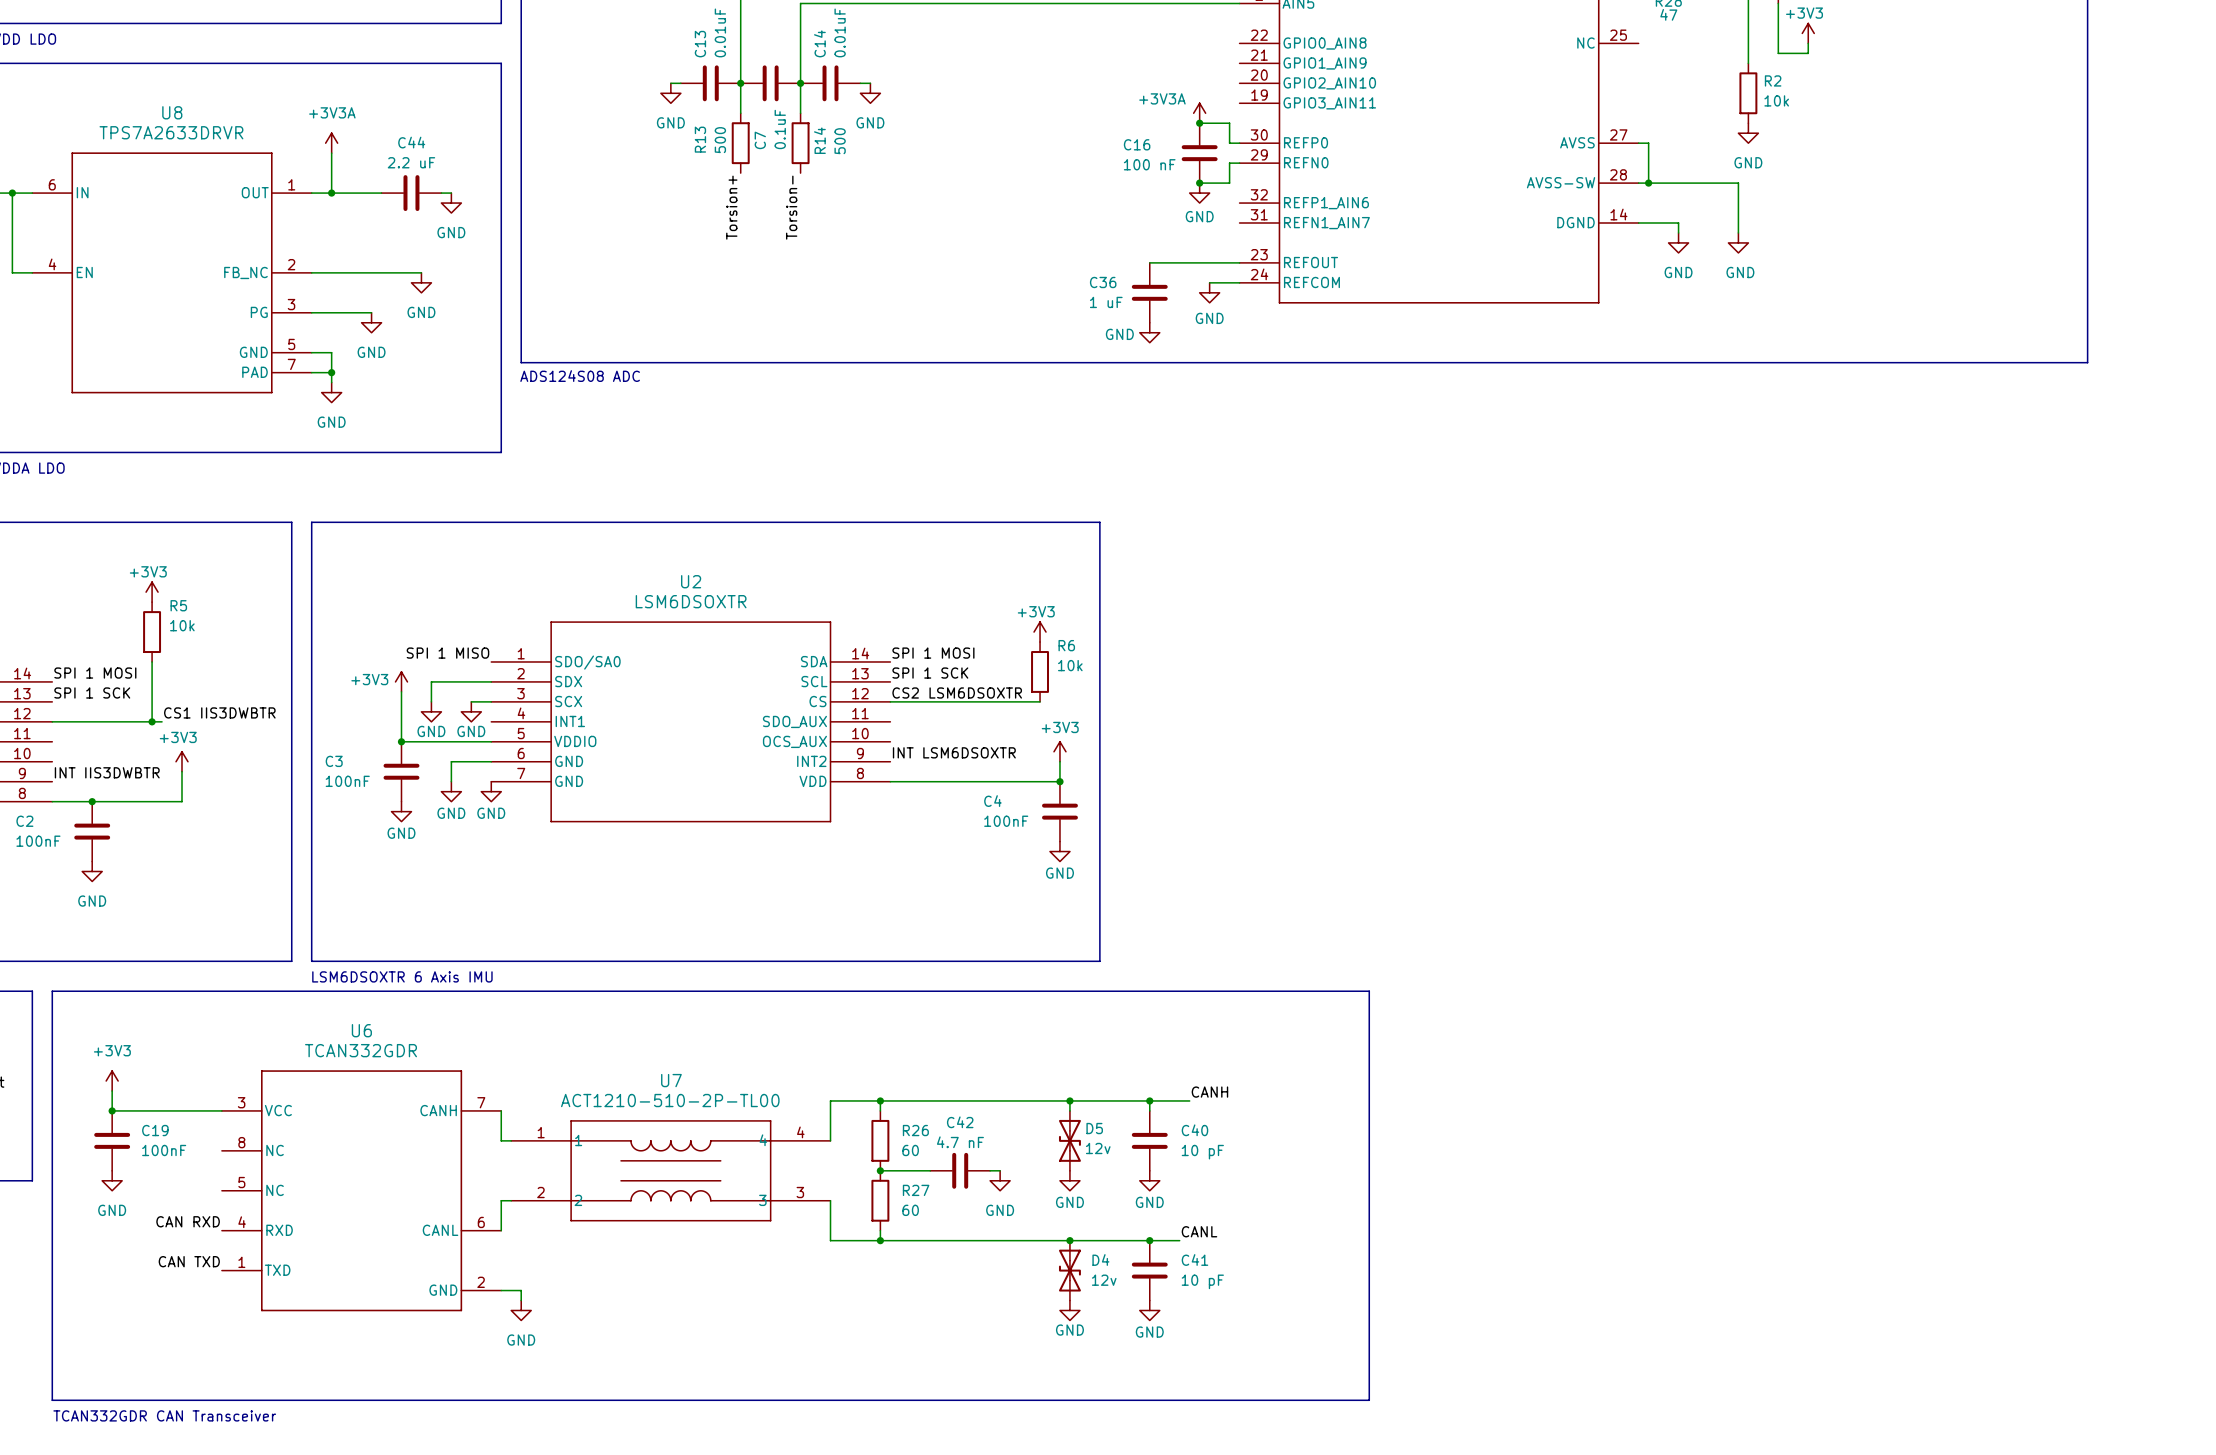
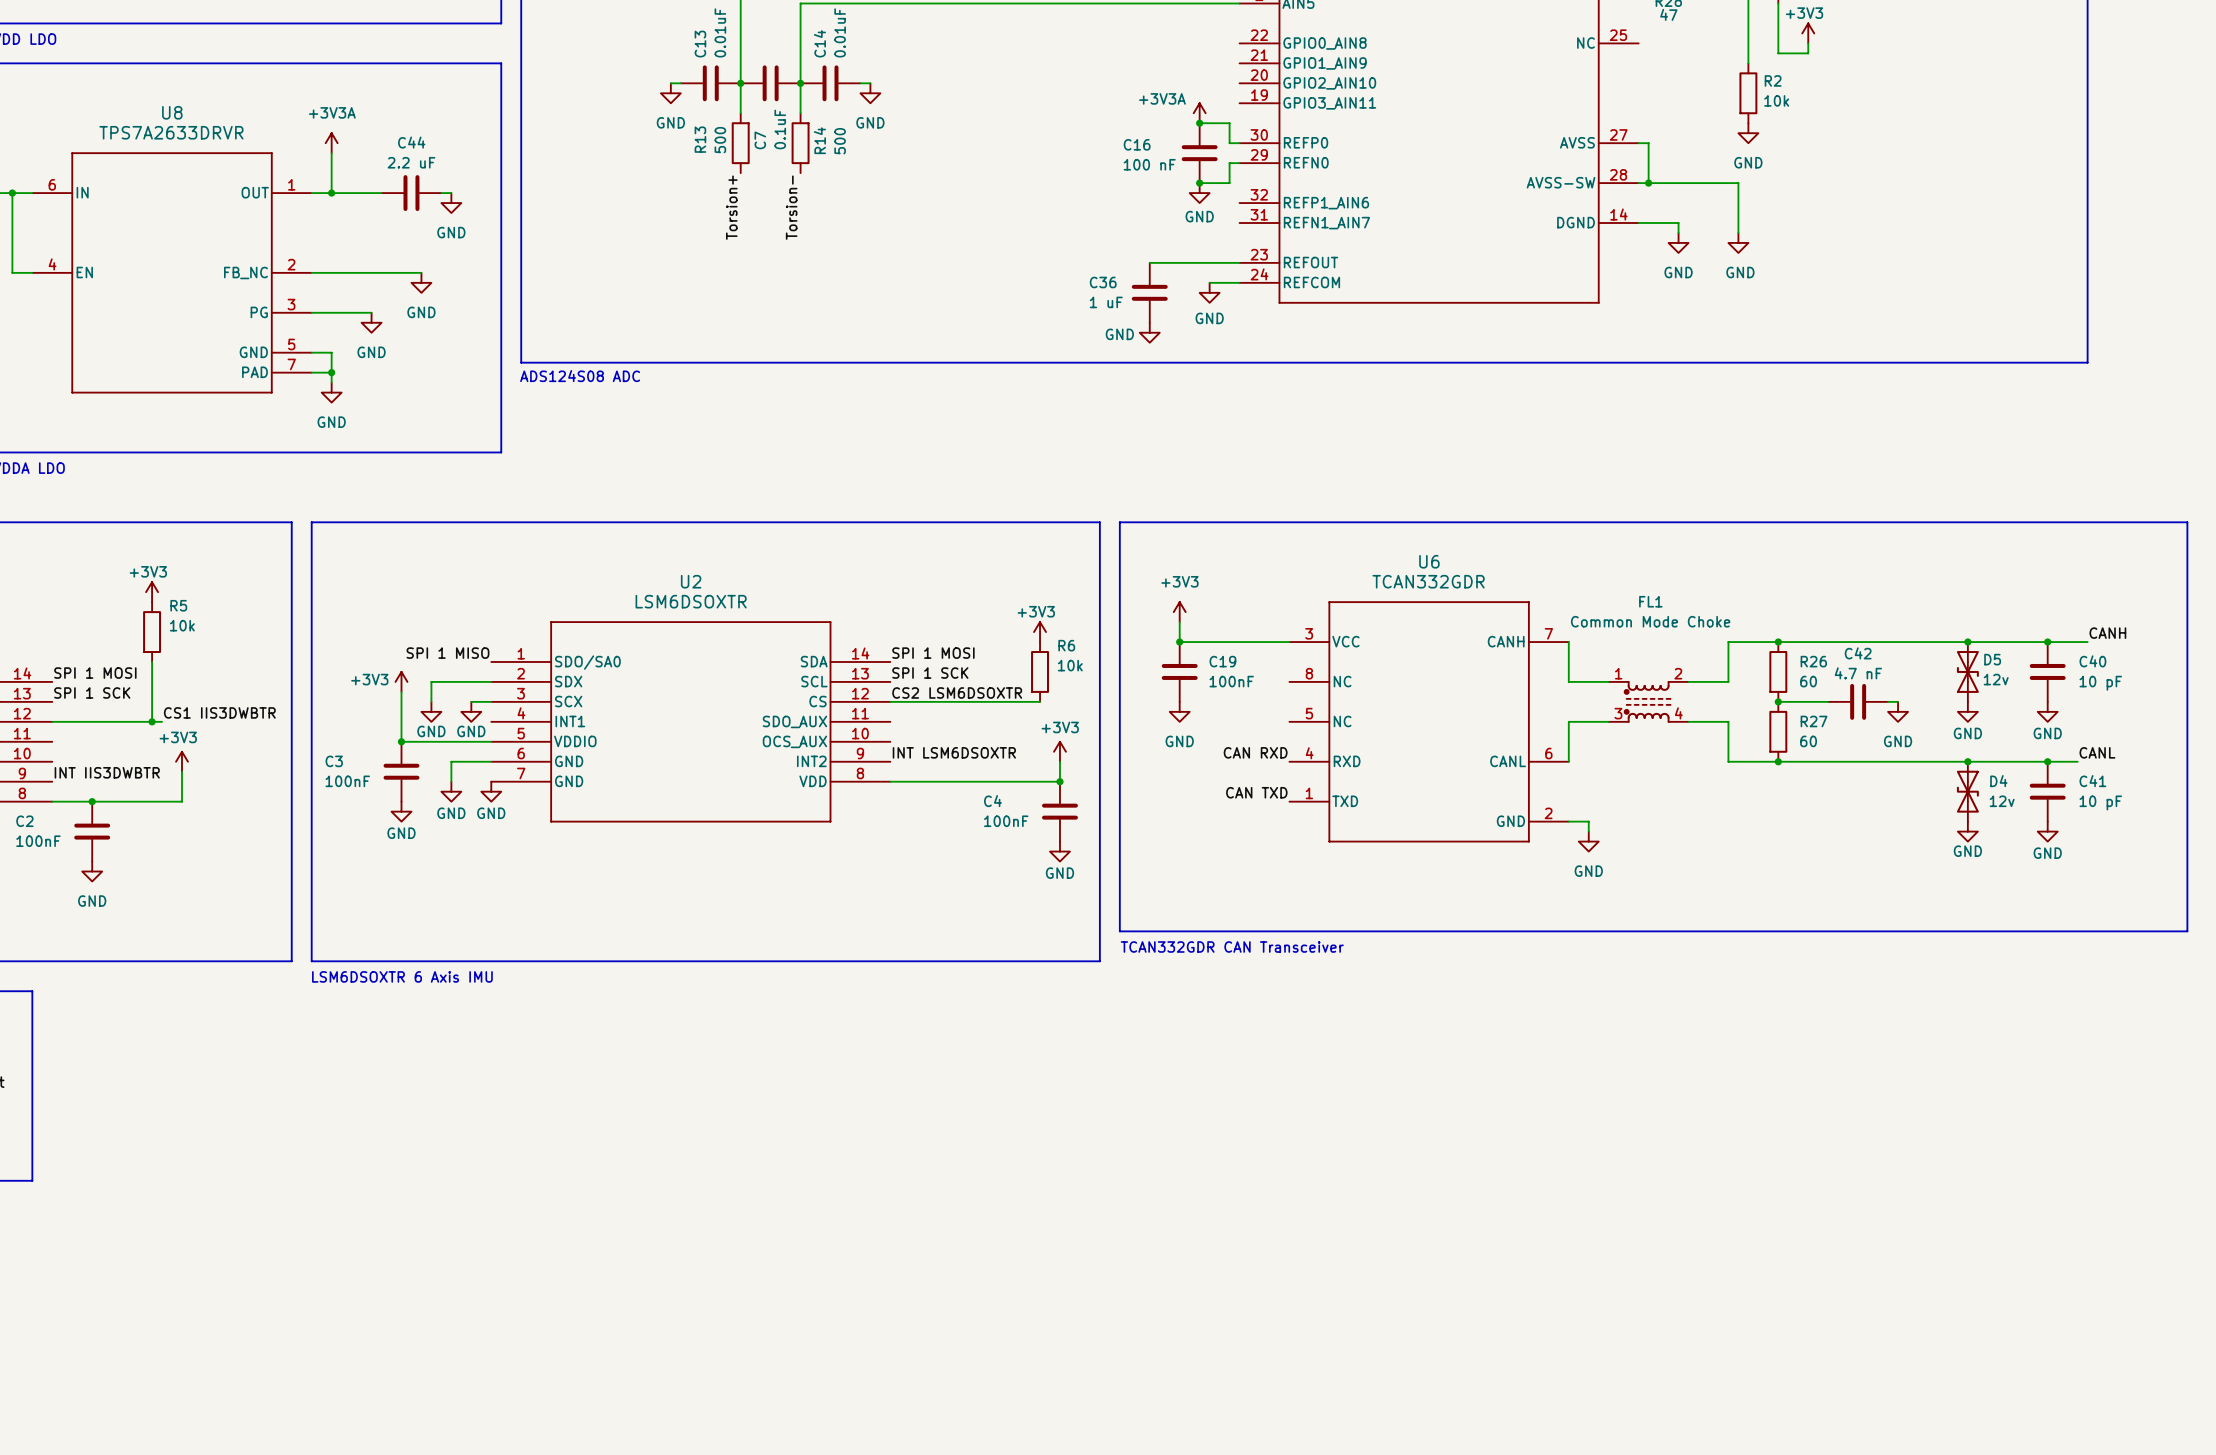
line: none -> (1119, 522) (2187, 522) (2187, 931) (1119, 931) (1119, 522)
power symbol: none -> +3V3 (1179, 612)
wire: none -> (1179, 622) (1179, 642) (1289, 642)
label: none -> CANH (2107, 633)
junction: none -> (1179, 642)
wire: none -> (1568, 642) (1568, 681) (1608, 681)
junction: none -> (1778, 642)
junction: none -> (1967, 642)
junction: none -> (2047, 642)
wire: none -> (2087, 642) (1728, 642) (1728, 681) (1688, 681)
FL1: none -> Common Mode Choke (1648, 701)
wire: none -> (1778, 701) (1828, 701)
junction: none -> (1778, 701)
wire: none -> (1888, 701) (1898, 701)
power symbol: none -> GND (1179, 711)
power symbol: none -> GND (1898, 711)
power symbol: none -> GND (1967, 711)
power symbol: none -> GND (2047, 711)
wire: none -> (1608, 721) (1568, 721) (1568, 761)
wire: none -> (1688, 721) (1728, 721) (1728, 761) (2077, 761)
label: none -> CAN RXD (1255, 752)
label: none -> CANL (2097, 752)
junction: none -> (1778, 761)
junction: none -> (1967, 761)
junction: none -> (2047, 761)
label: none -> CAN TXD (1256, 792)
wire: none -> (1568, 821) (1588, 821) (1588, 831)
power symbol: none -> GND (1967, 831)
power symbol: none -> GND (2047, 831)
power symbol: none -> GND (1588, 841)
text: none -> TCAN332GDR CAN Transceiver (1232, 946)
line: (52, 991) (1369, 991) (1369, 1400) (52, 1400) (52, 991) -> none
power symbol: +3V3 (112, 1081) -> none
wire: (112, 1091) (112, 1110) (221, 1110) -> none
label: CANH (1209, 1092) -> none
wire: (880, 1100) (880, 1110) -> none
junction: (880, 1100) -> none
wire: (1069, 1100) (1069, 1110) -> none
junction: (1069, 1100) -> none
wire: (1149, 1100) (1149, 1110) -> none
junction: (1149, 1100) -> none
wire: (1189, 1100) (830, 1100) (830, 1140) -> none
junction: (112, 1110) -> none
wire: (501, 1110) (501, 1140) (511, 1140) -> none
C19 position: (112, 1140) -> (1179, 671)
R26 position: (880, 1140) -> (1778, 671)
D5 position: (1069, 1140) -> (1967, 671)
C40 position: (1149, 1140) -> (2047, 671)
U7: ACT1210-510-2P-TL00 (670, 1170) -> none
wire: (880, 1170) (930, 1170) -> none
junction: (880, 1170) -> none
C42 position: (960, 1170) -> (1858, 701)
wire: (990, 1170) (1000, 1170) -> none
power symbol: GND (112, 1180) -> none
power symbol: GND (1000, 1180) -> none
power symbol: GND (1069, 1180) -> none
power symbol: GND (1149, 1180) -> none
U6 position: (361, 1190) -> (1429, 721)
wire: (511, 1200) (501, 1200) (501, 1230) -> none
wire: (830, 1200) (830, 1240) (1179, 1240) -> none
R27 position: (880, 1200) -> (1778, 731)
label: CAN RXD (188, 1221) -> none
wire: (880, 1230) (880, 1240) -> none
label: CANL (1199, 1231) -> none
junction: (880, 1240) -> none
junction: (1069, 1240) -> none
junction: (1149, 1240) -> none
label: CAN TXD (189, 1261) -> none
D4 position: (1069, 1270) -> (1967, 791)
C41 position: (1149, 1270) -> (2047, 791)
wire: (501, 1290) (521, 1290) (521, 1300) -> none
power symbol: GND (521, 1310) -> none
power symbol: GND (1069, 1310) -> none
power symbol: GND (1149, 1310) -> none
text: TCAN332GDR CAN Transceiver (164, 1415) -> none

